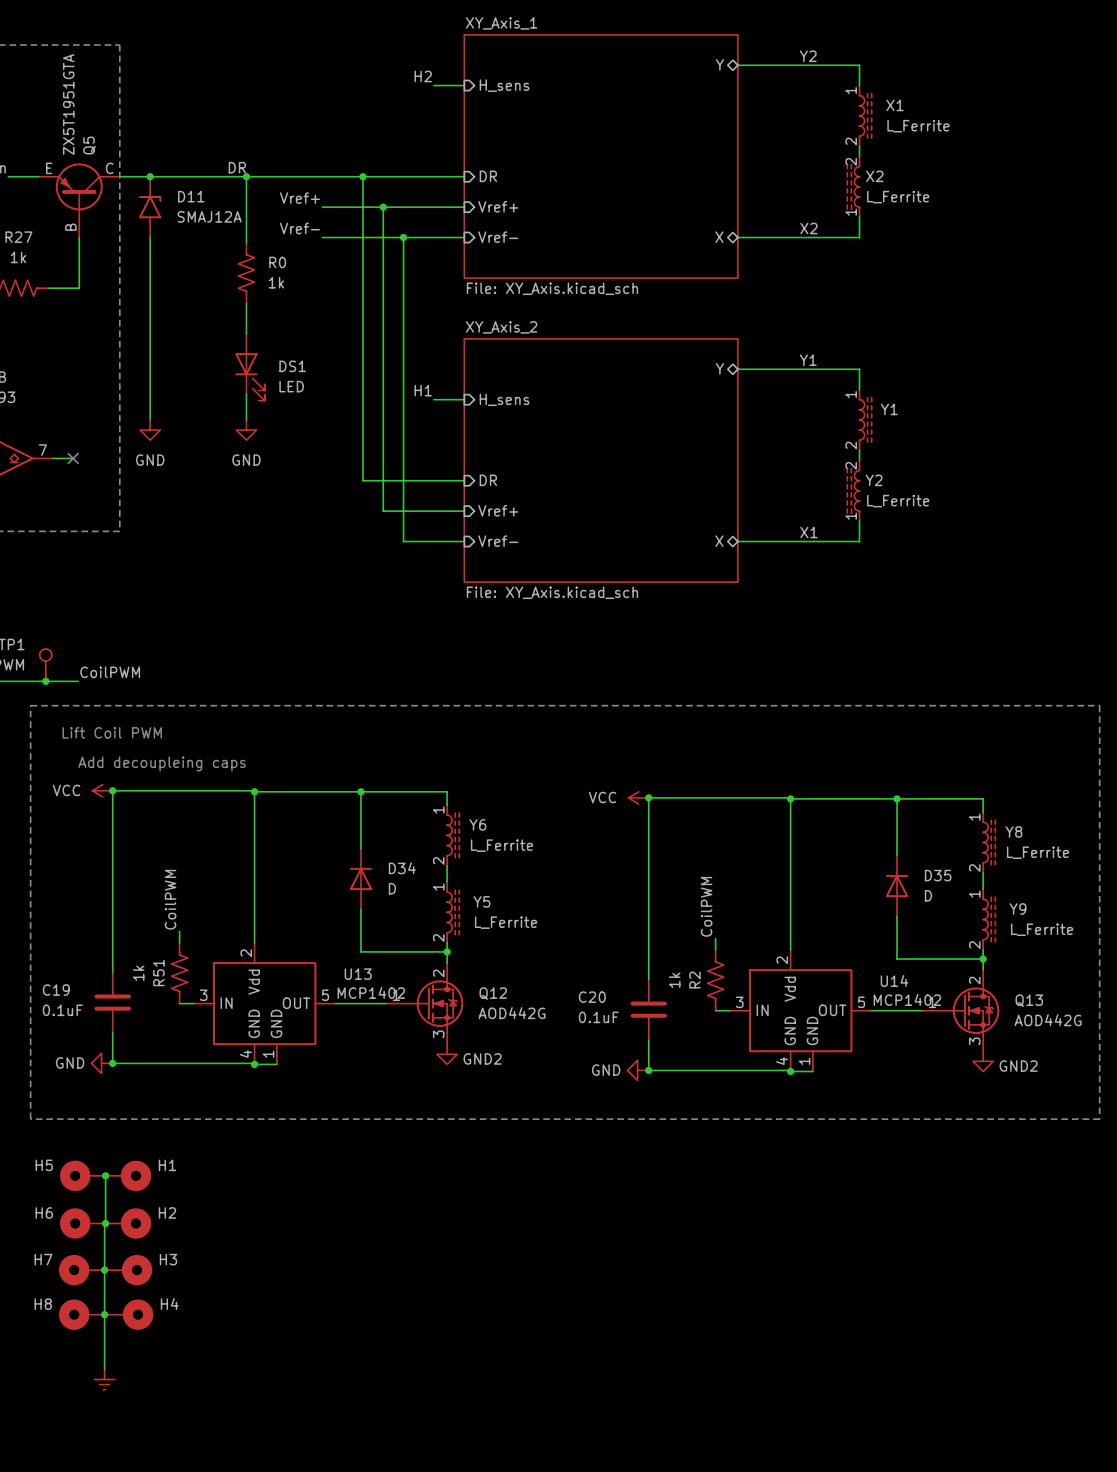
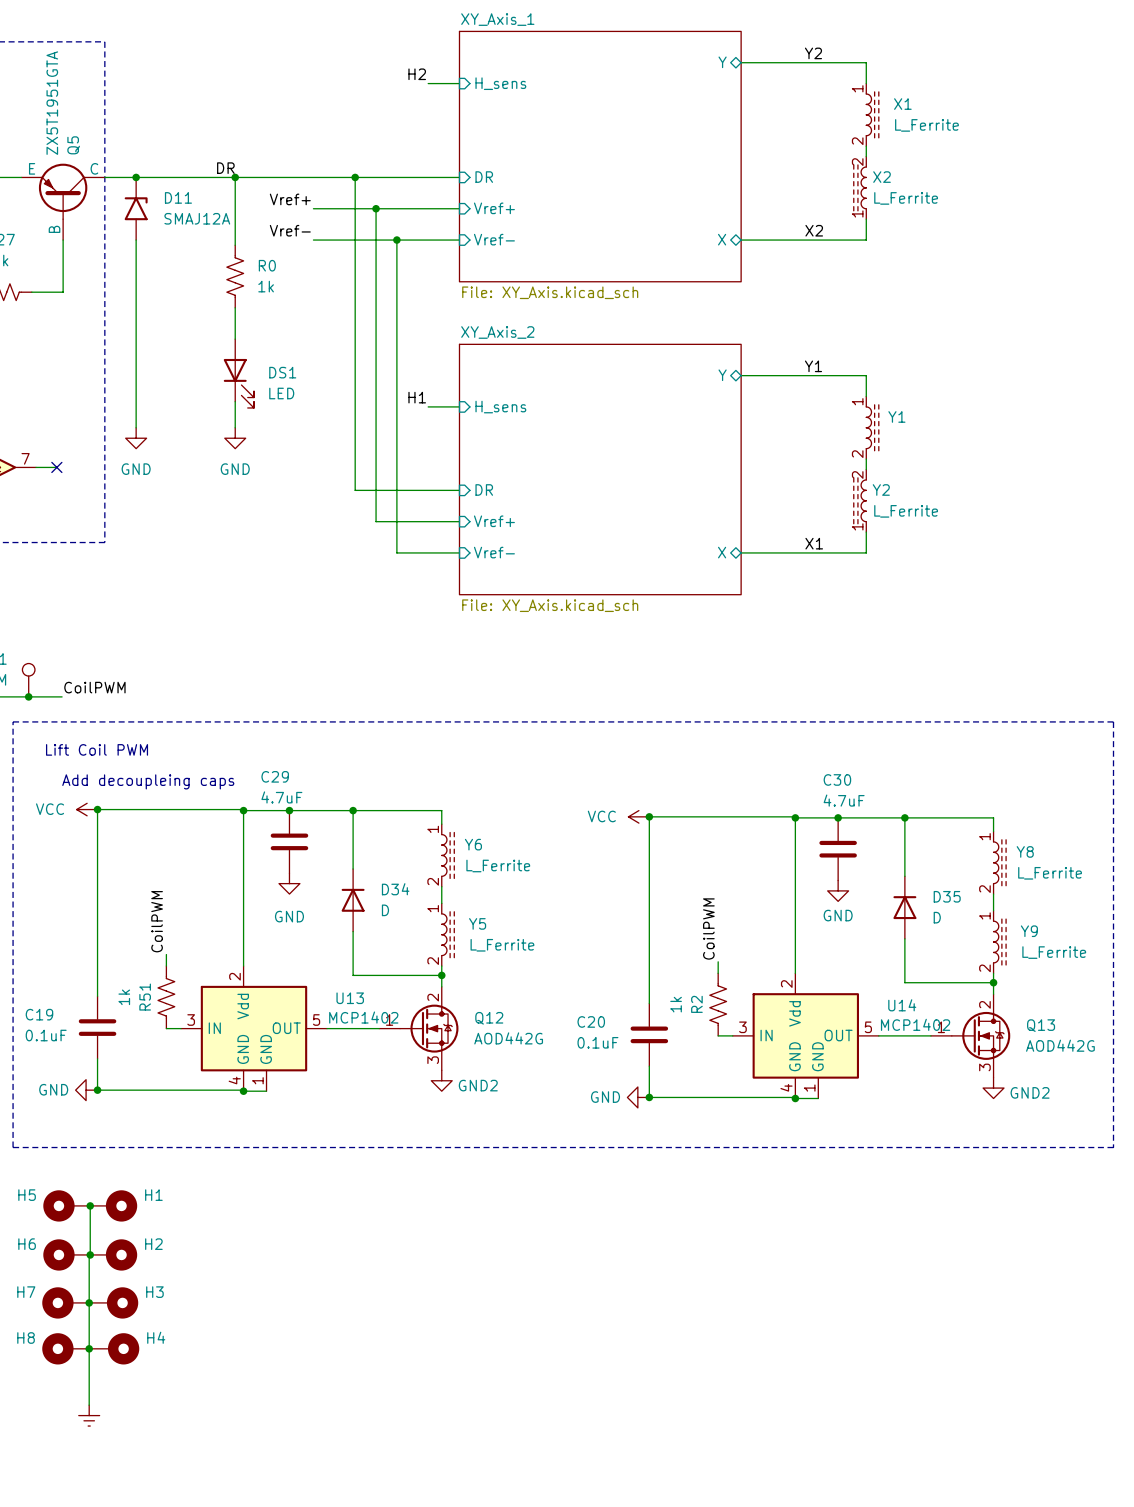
junction: none -> (289, 810)
junction: none -> (838, 817)
C29: none -> 4.7uF (289, 841)
C30: none -> 4.7uF (838, 849)
power symbol: none -> GND (289, 883)
power symbol: none -> GND (838, 890)

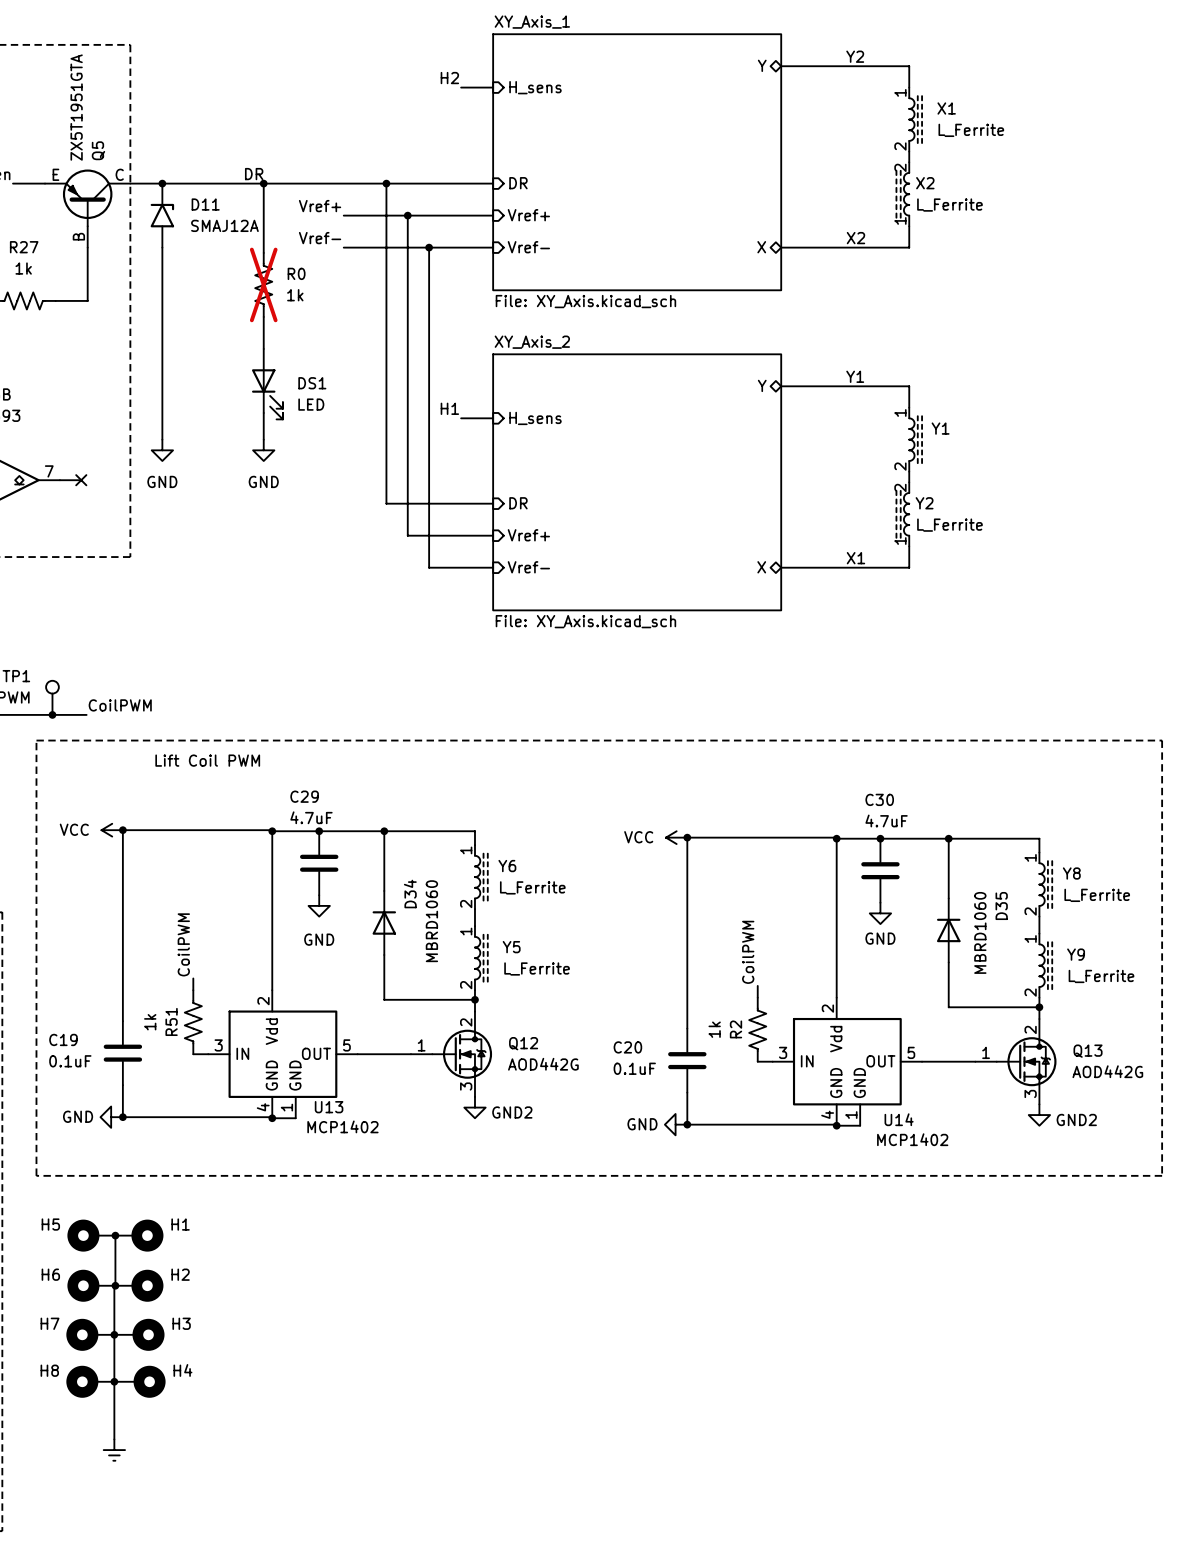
R0 do-not-place cross: none -> (263, 284)
text position: Lift Coil PWM (97, 749) -> Lift Coil PWM (207, 760)
text: Add decoupleing caps (148, 781) -> none
D34 name rotation: 0° (395, 889) -> 90° counterclockwise (410, 894)
D35 name rotation: 0° (947, 896) -> 90° counterclockwise (1001, 906)
D34 value: D (385, 910) -> MBRD1060 (431, 921)
D35 value: D (937, 917) -> MBRD1060 (980, 932)
U13 name position: U13 (350, 998) -> U13 (329, 1107)
U14 name position: U14 (902, 1005) -> U14 (899, 1119)
U13 value position: MCP1402 (363, 1017) -> MCP1402 (342, 1126)
U14 value position: MCP1402 (915, 1024) -> MCP1402 (912, 1139)

